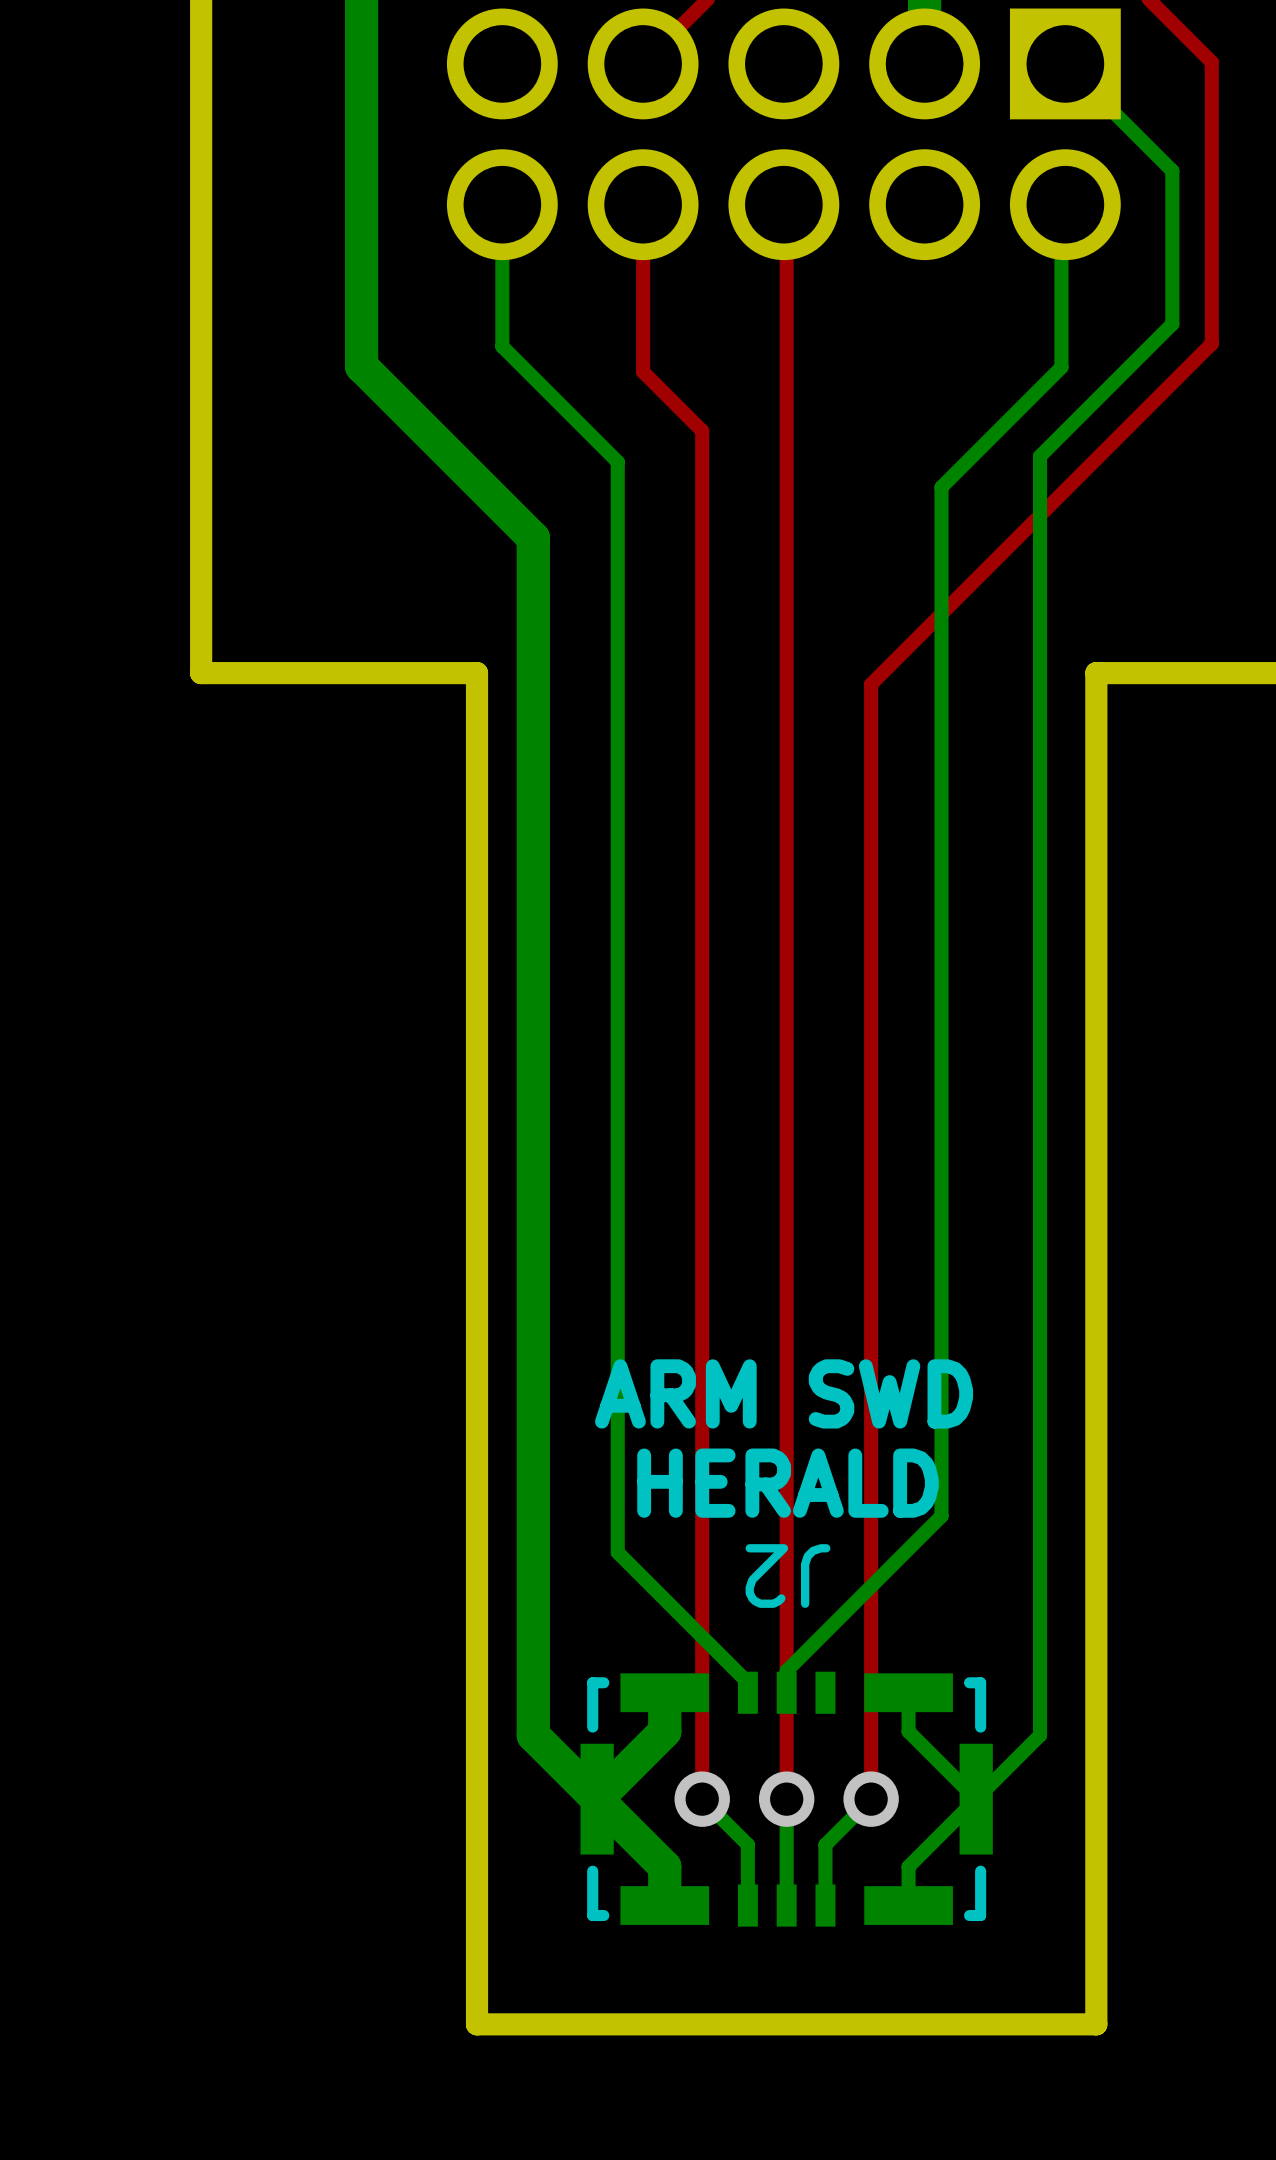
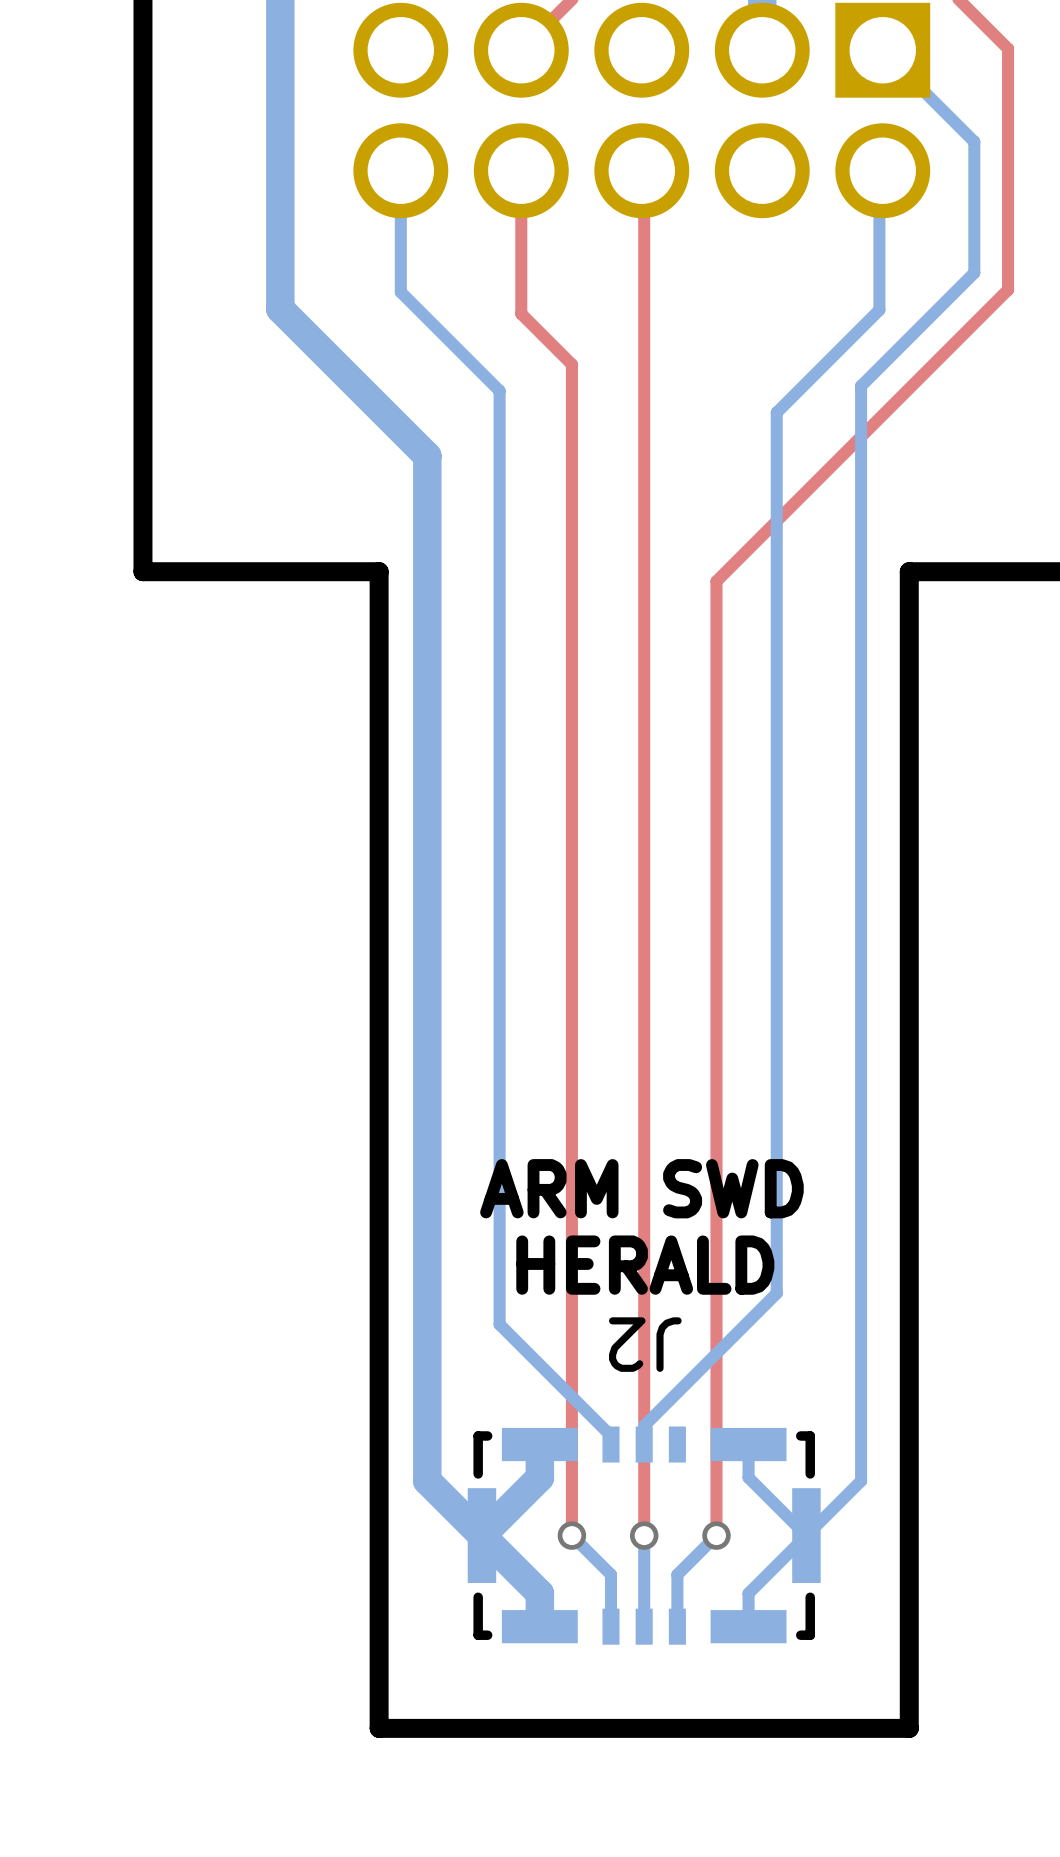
via size: [674, 1771, 730, 1827] -> [557, 1521, 587, 1550]
via size: [758, 1771, 815, 1827] -> [629, 1521, 659, 1550]
via size: [843, 1771, 899, 1827] -> [702, 1521, 731, 1550]

